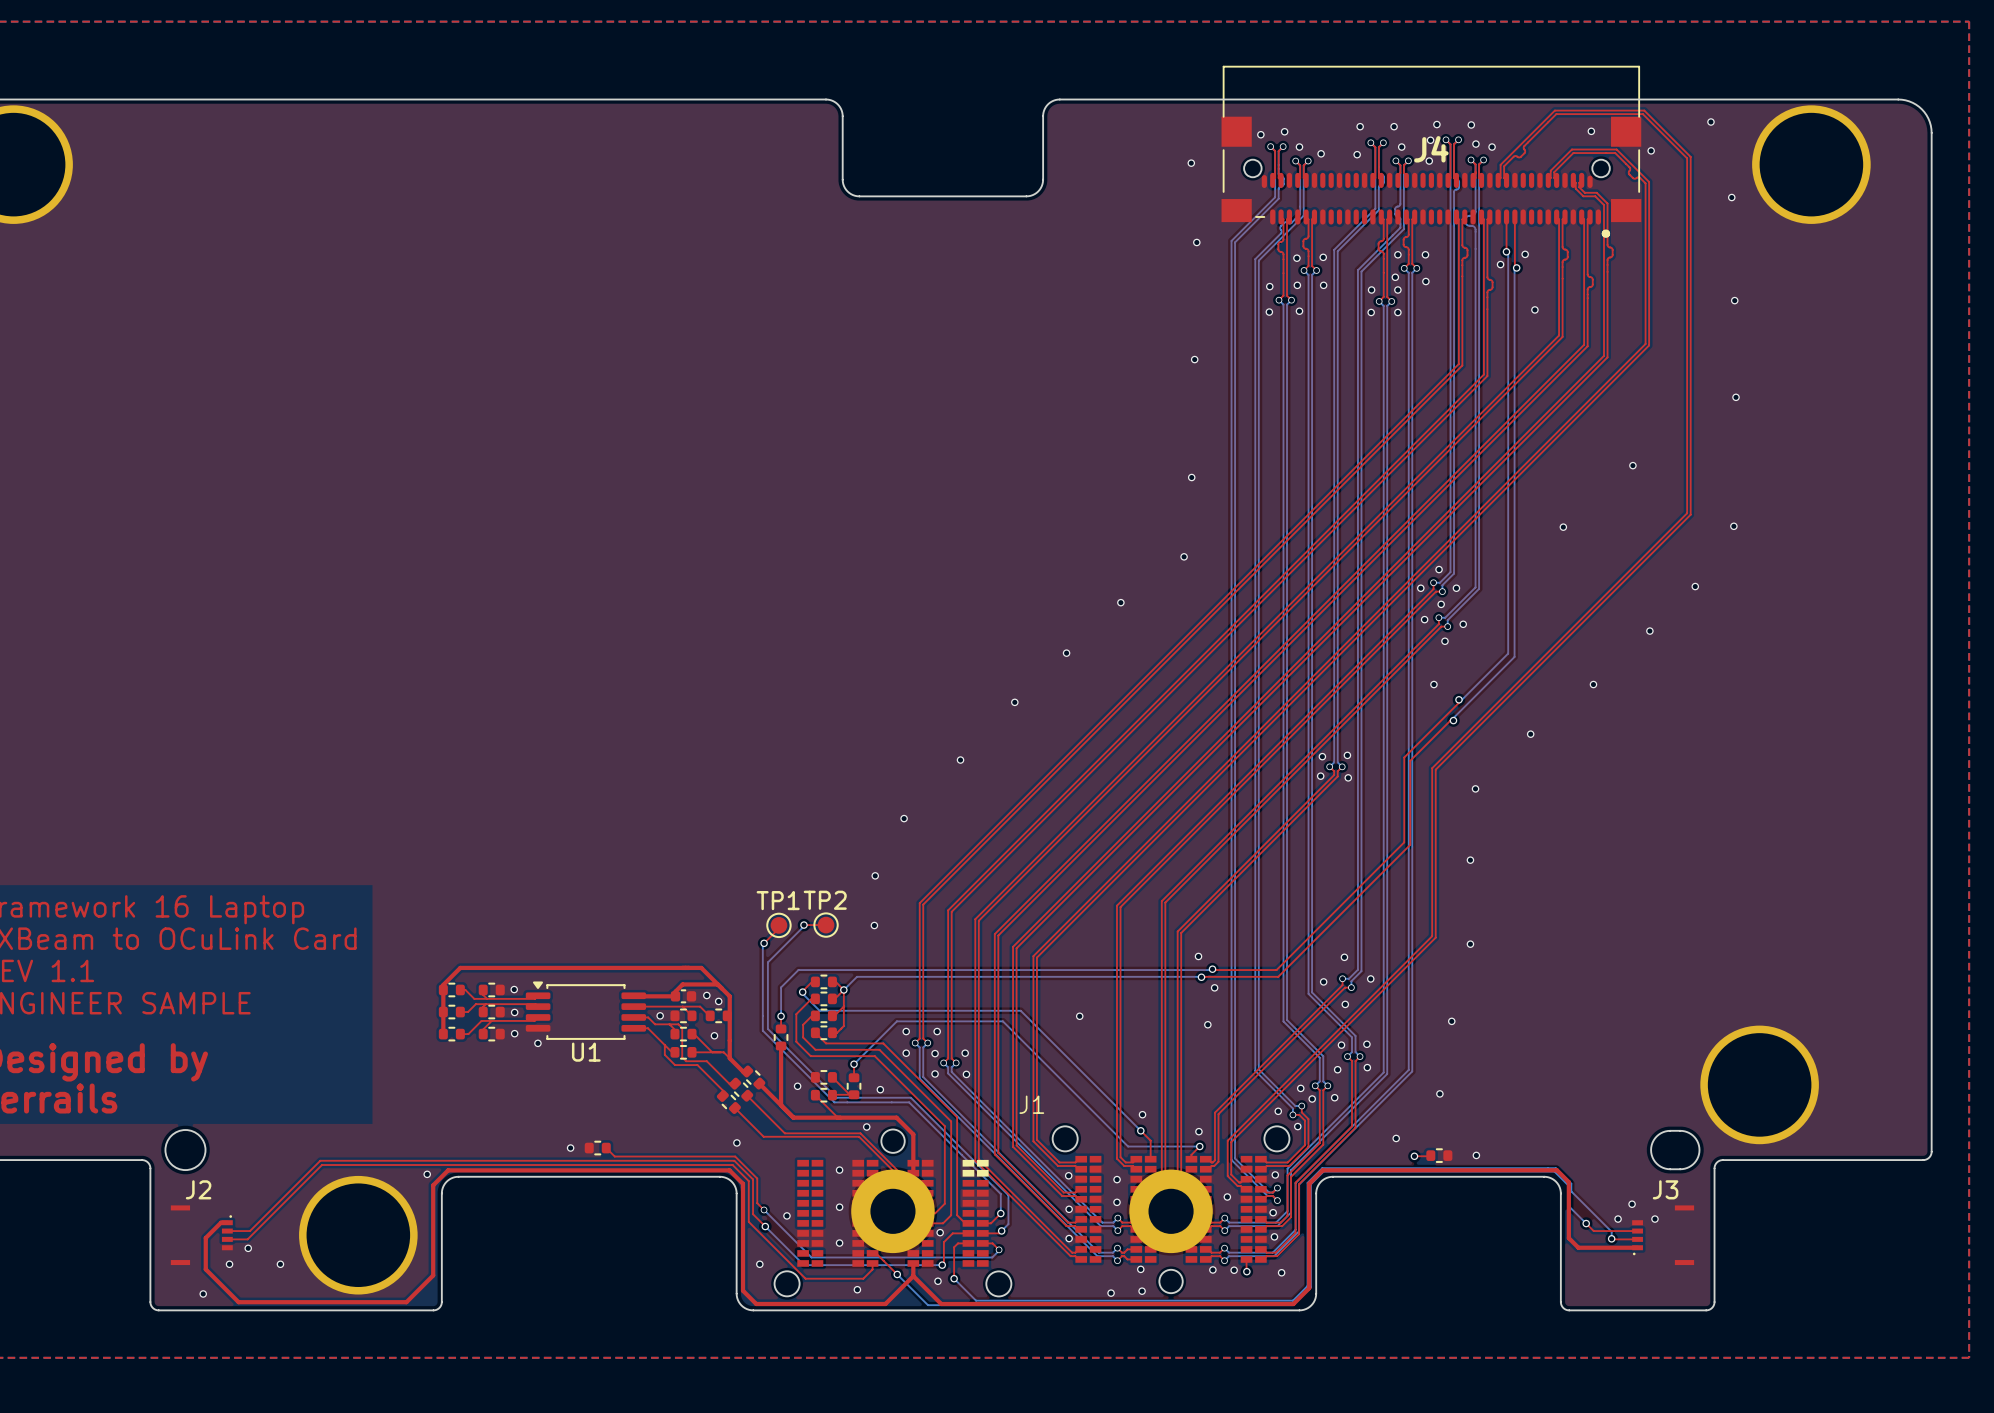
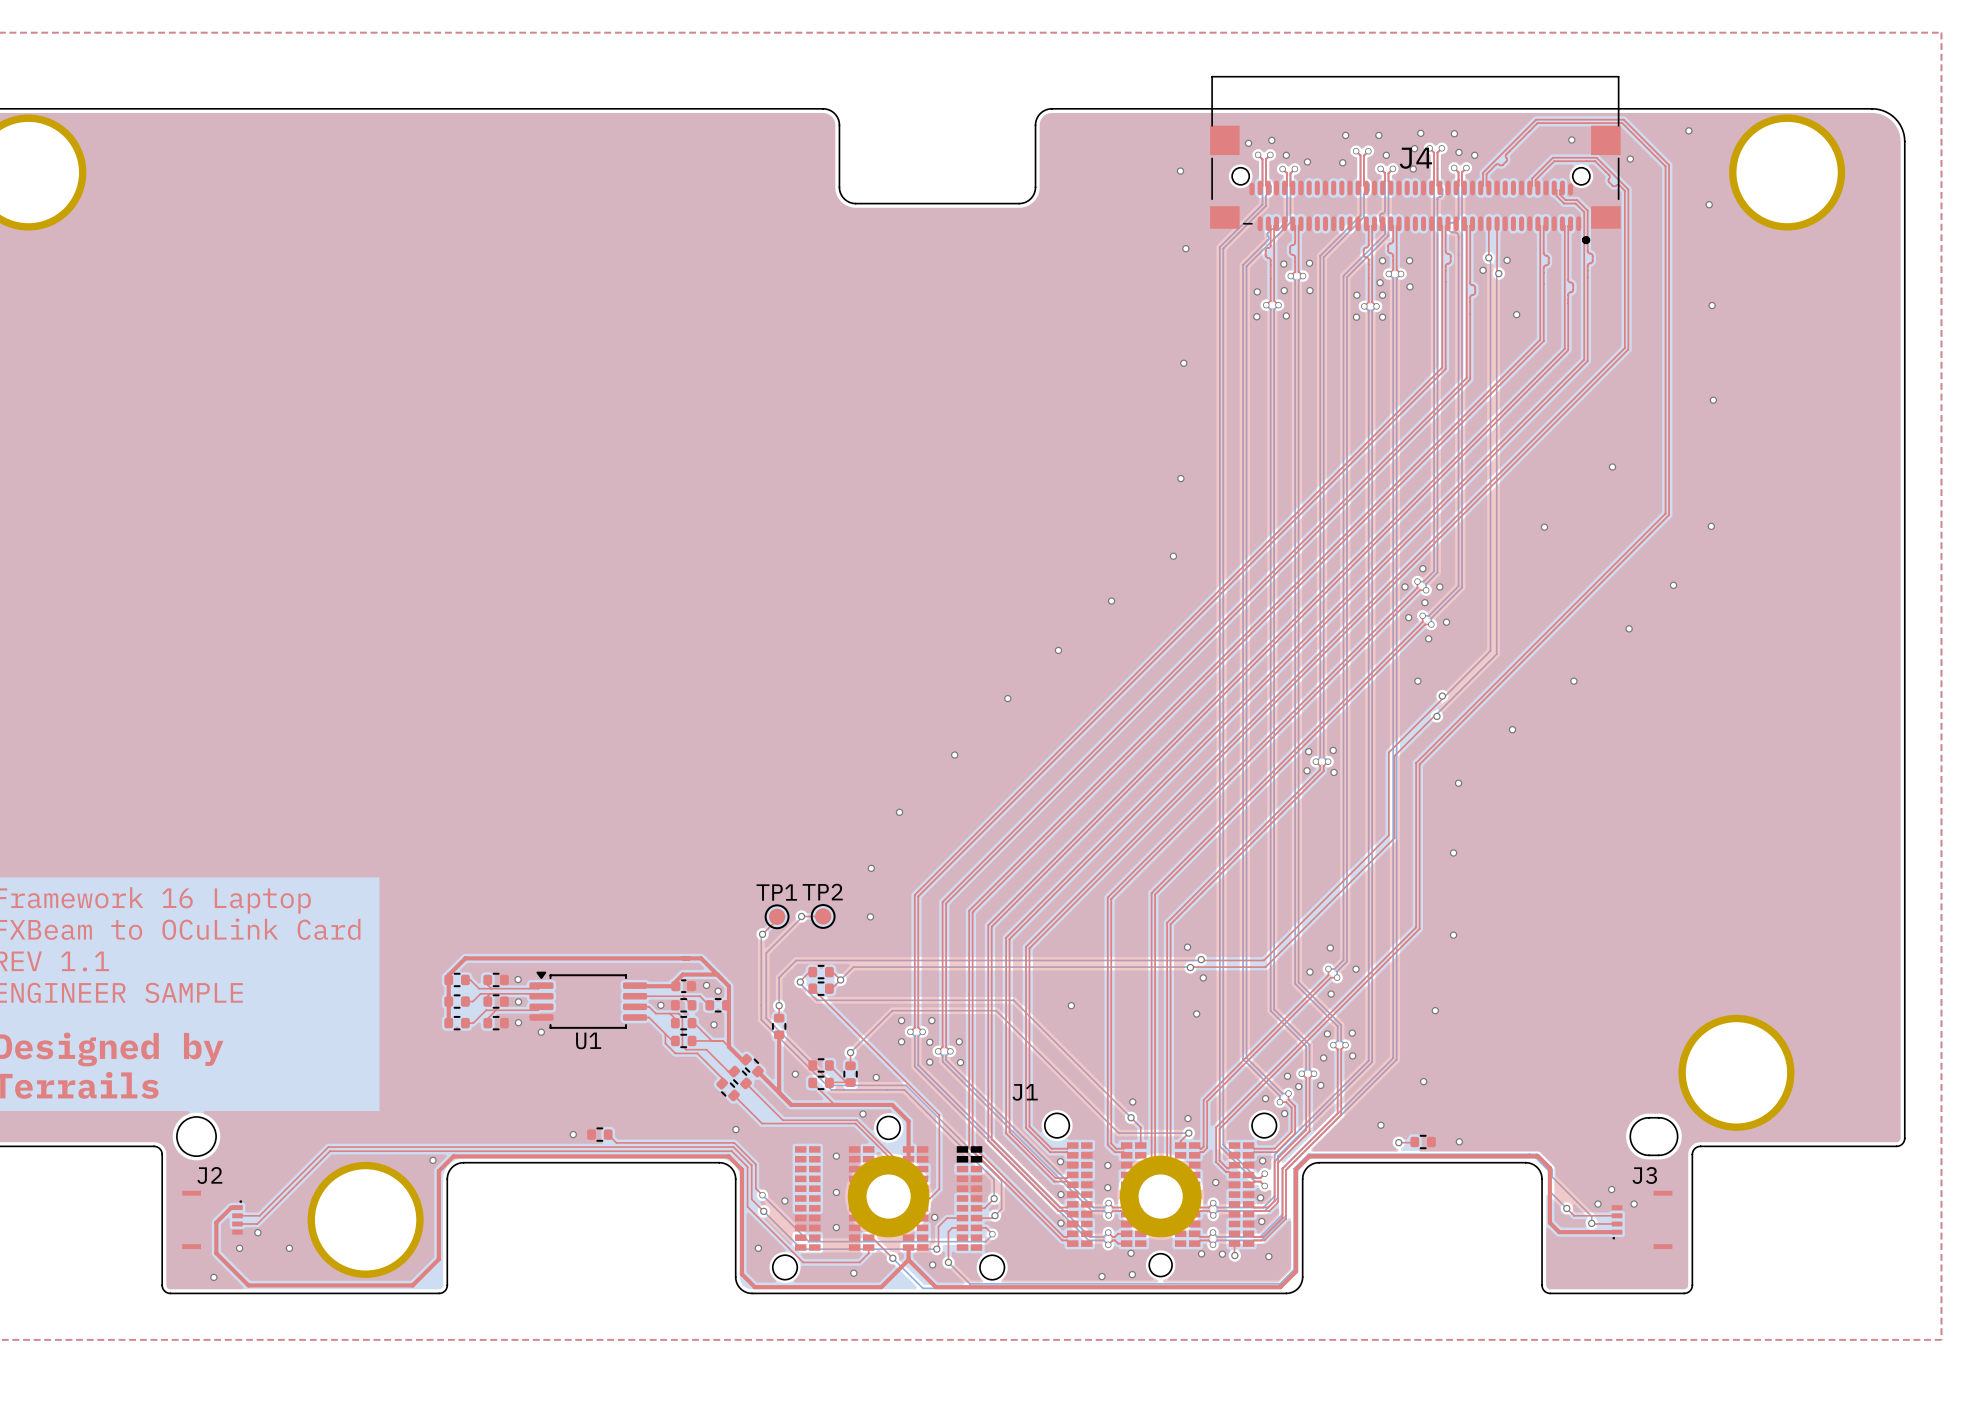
top track: (843, 989) (843, 1026) (837, 1032) (832, 1032) -> none
top track: (815, 998) (811, 998) (796, 1014) (796, 1041) (810, 1056) (874, 1056) (944, 1126) (944, 1128) -> (812, 988) (939, 1115)
top track: (843, 1006) (832, 1015) -> none
top track: (815, 1015) (812, 1015) (803, 1024) (803, 1037) (815, 1049) (879, 1049) (951, 1121) (951, 1215) (943, 1223) (927, 1223) -> none
part: (823, 1015) -> none
top track: (815, 1032) (826, 1043) (883, 1043) (957, 1117) (957, 1215) (965, 1223) (968, 1223) -> none
part: (823, 1032) -> none

